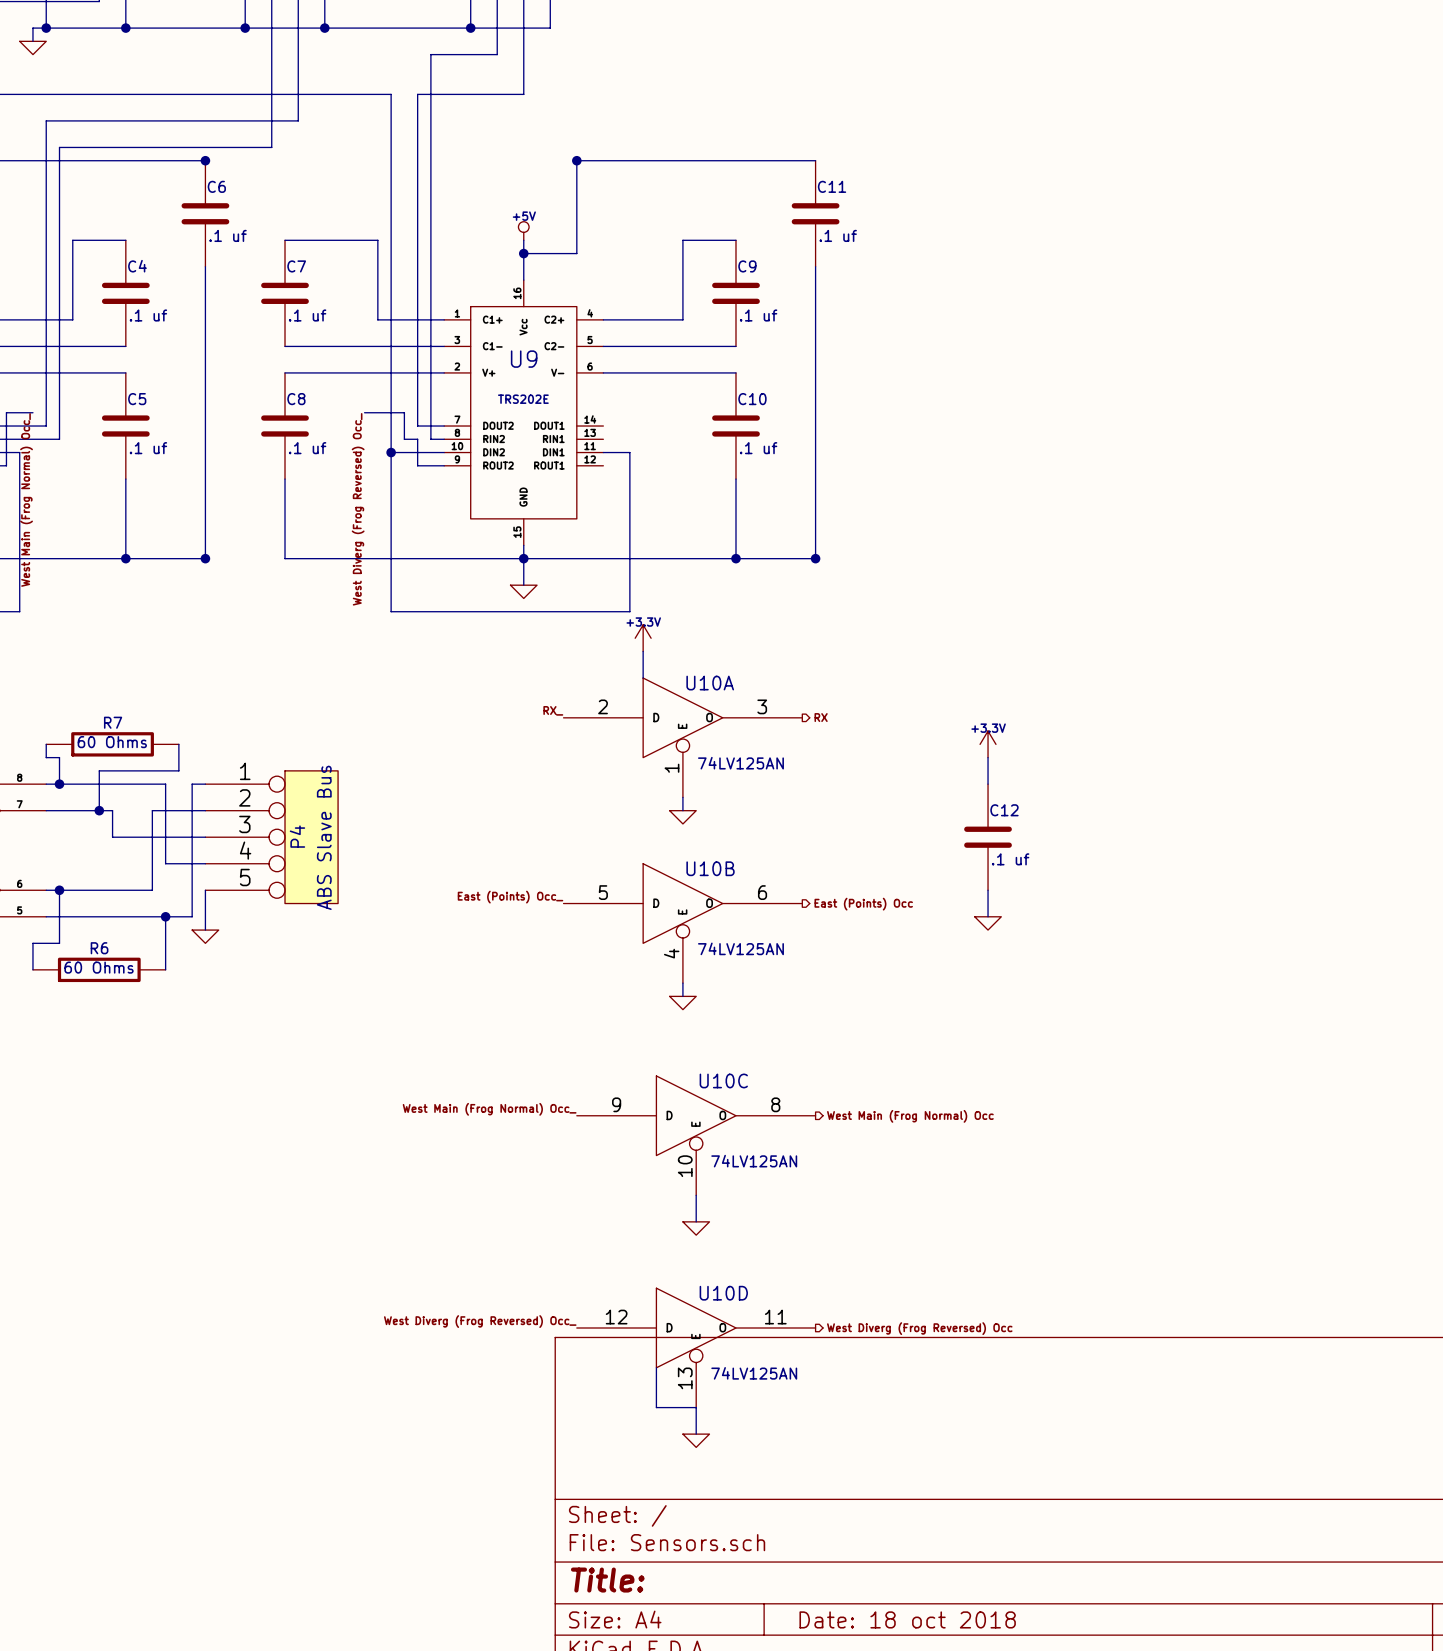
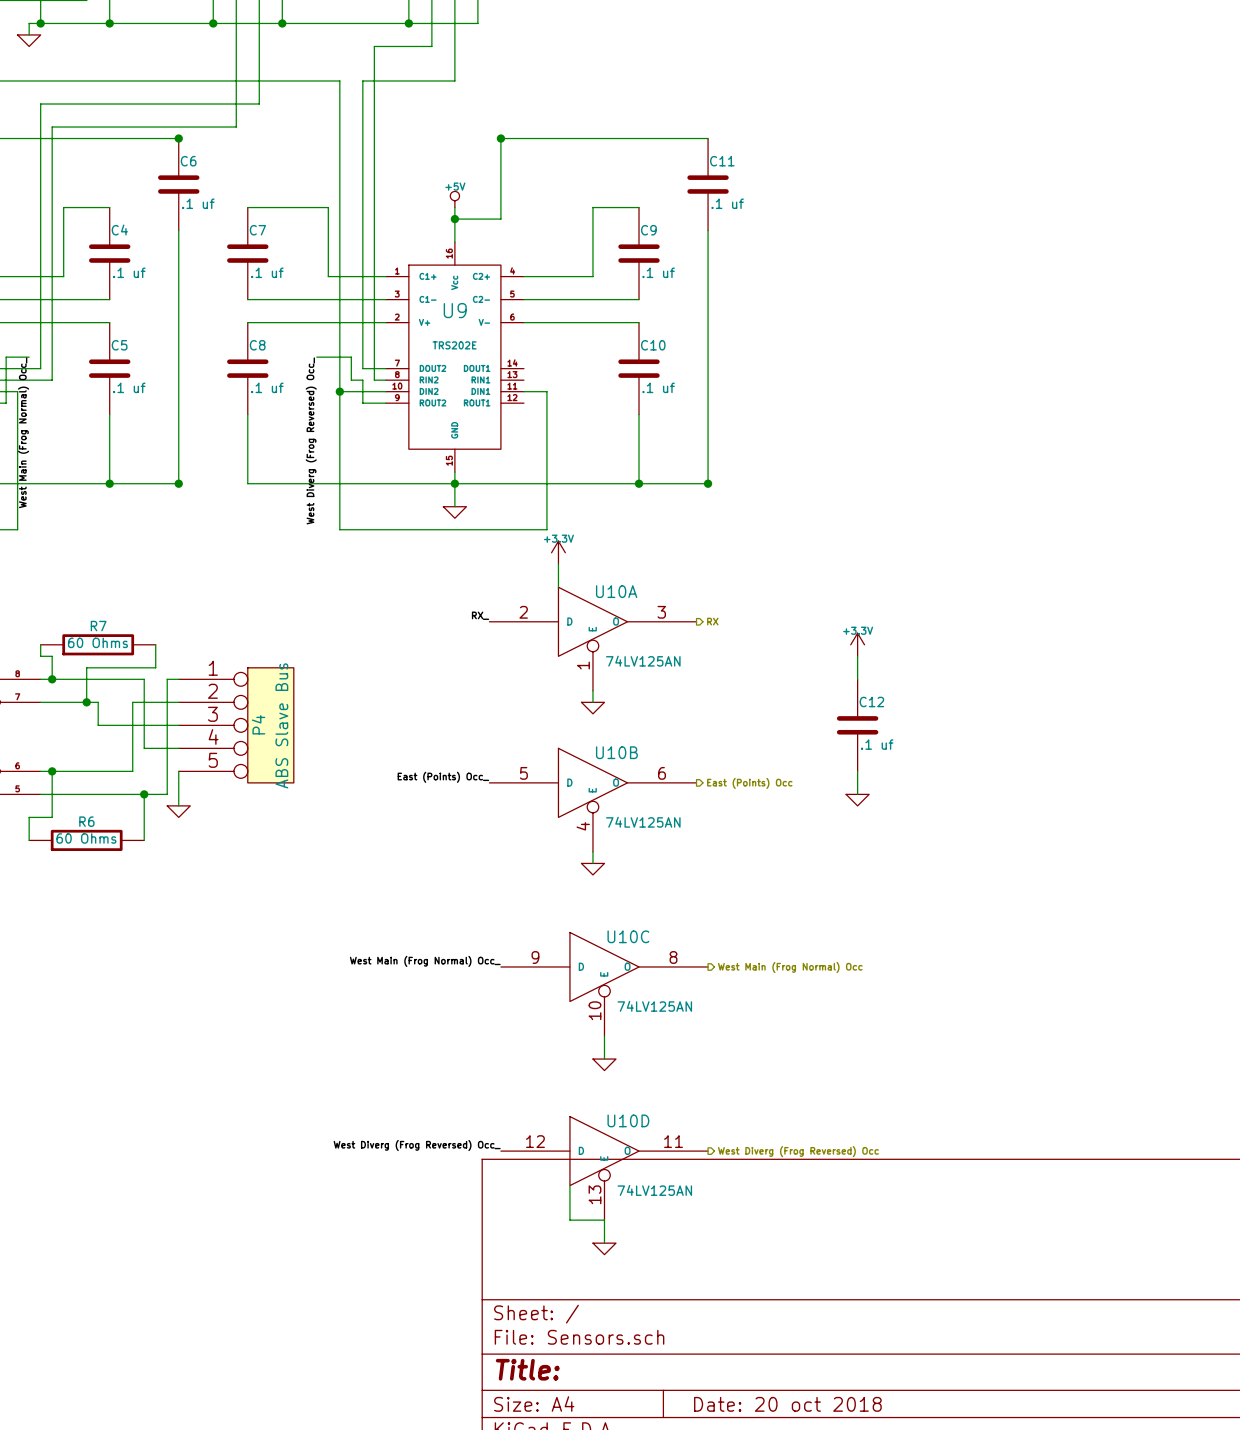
title block: Date: 18 oct 2018 (907, 1619) -> Date: 20 oct 2018 (787, 1404)

